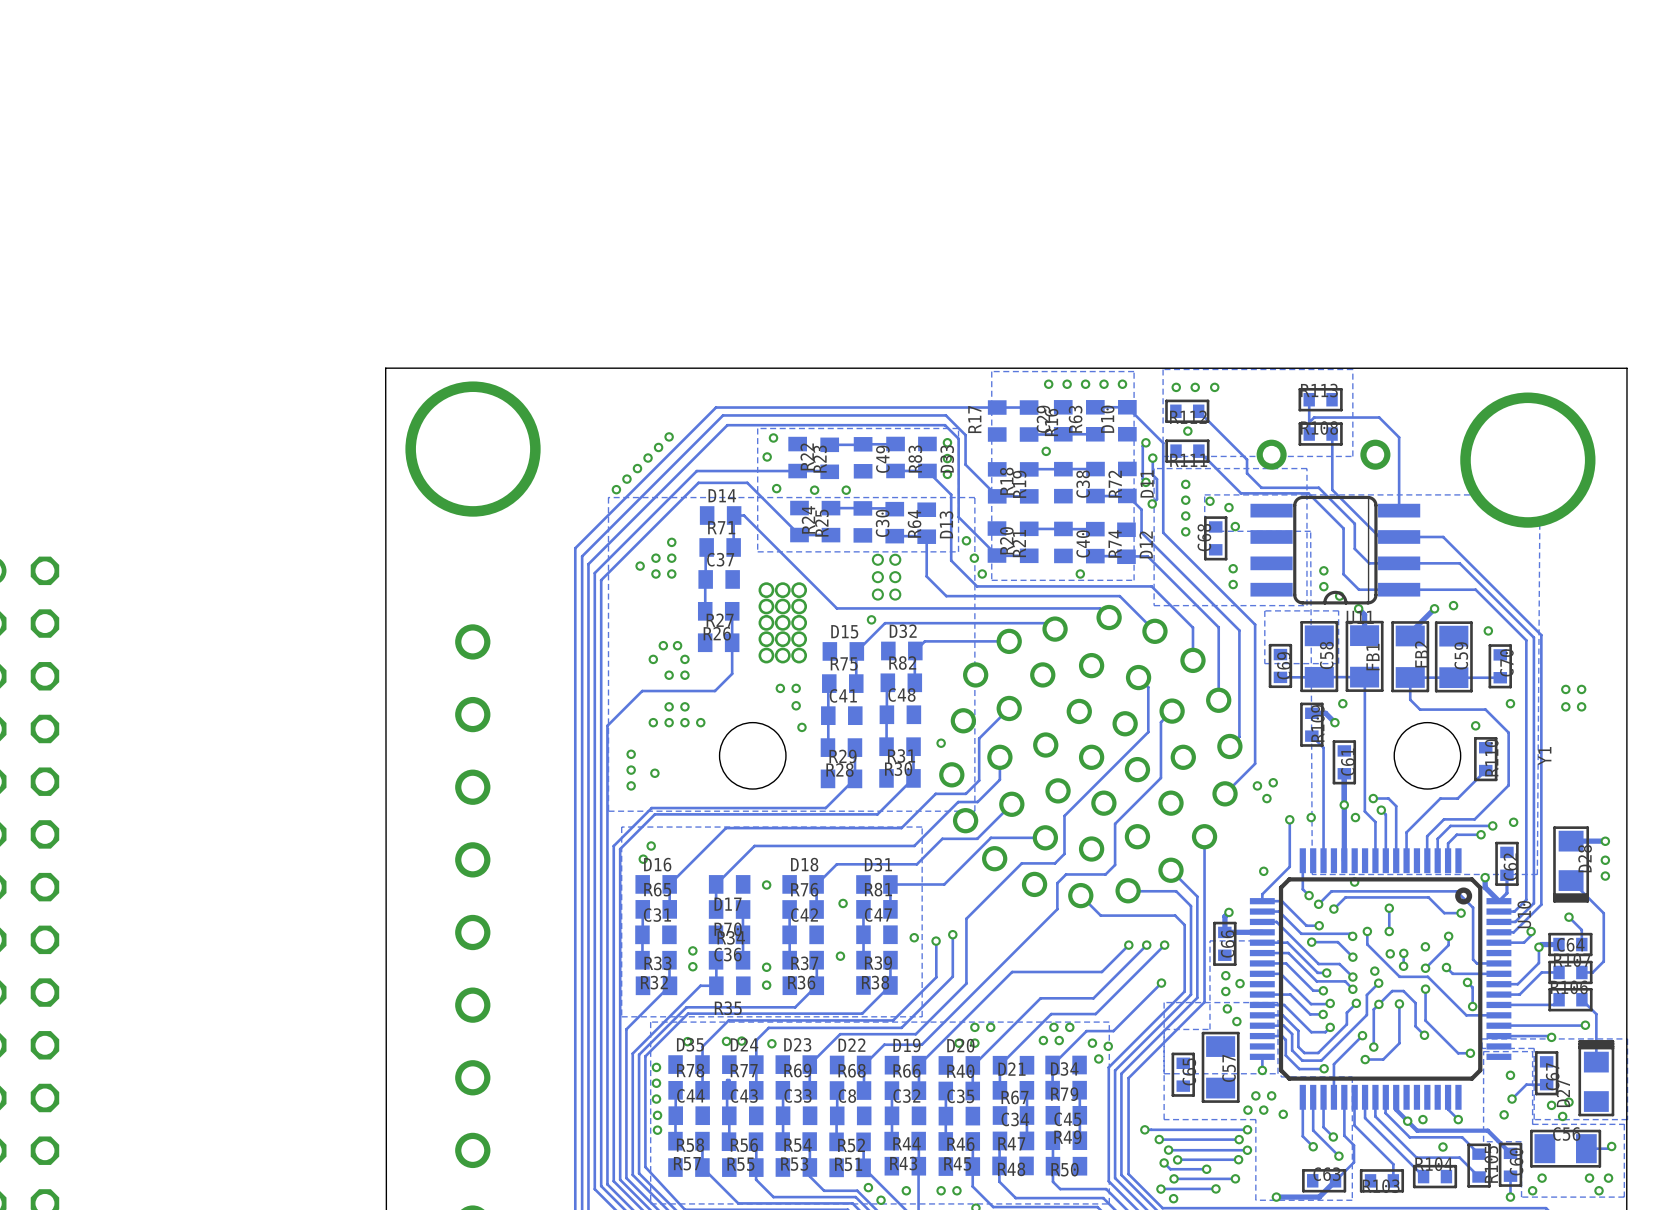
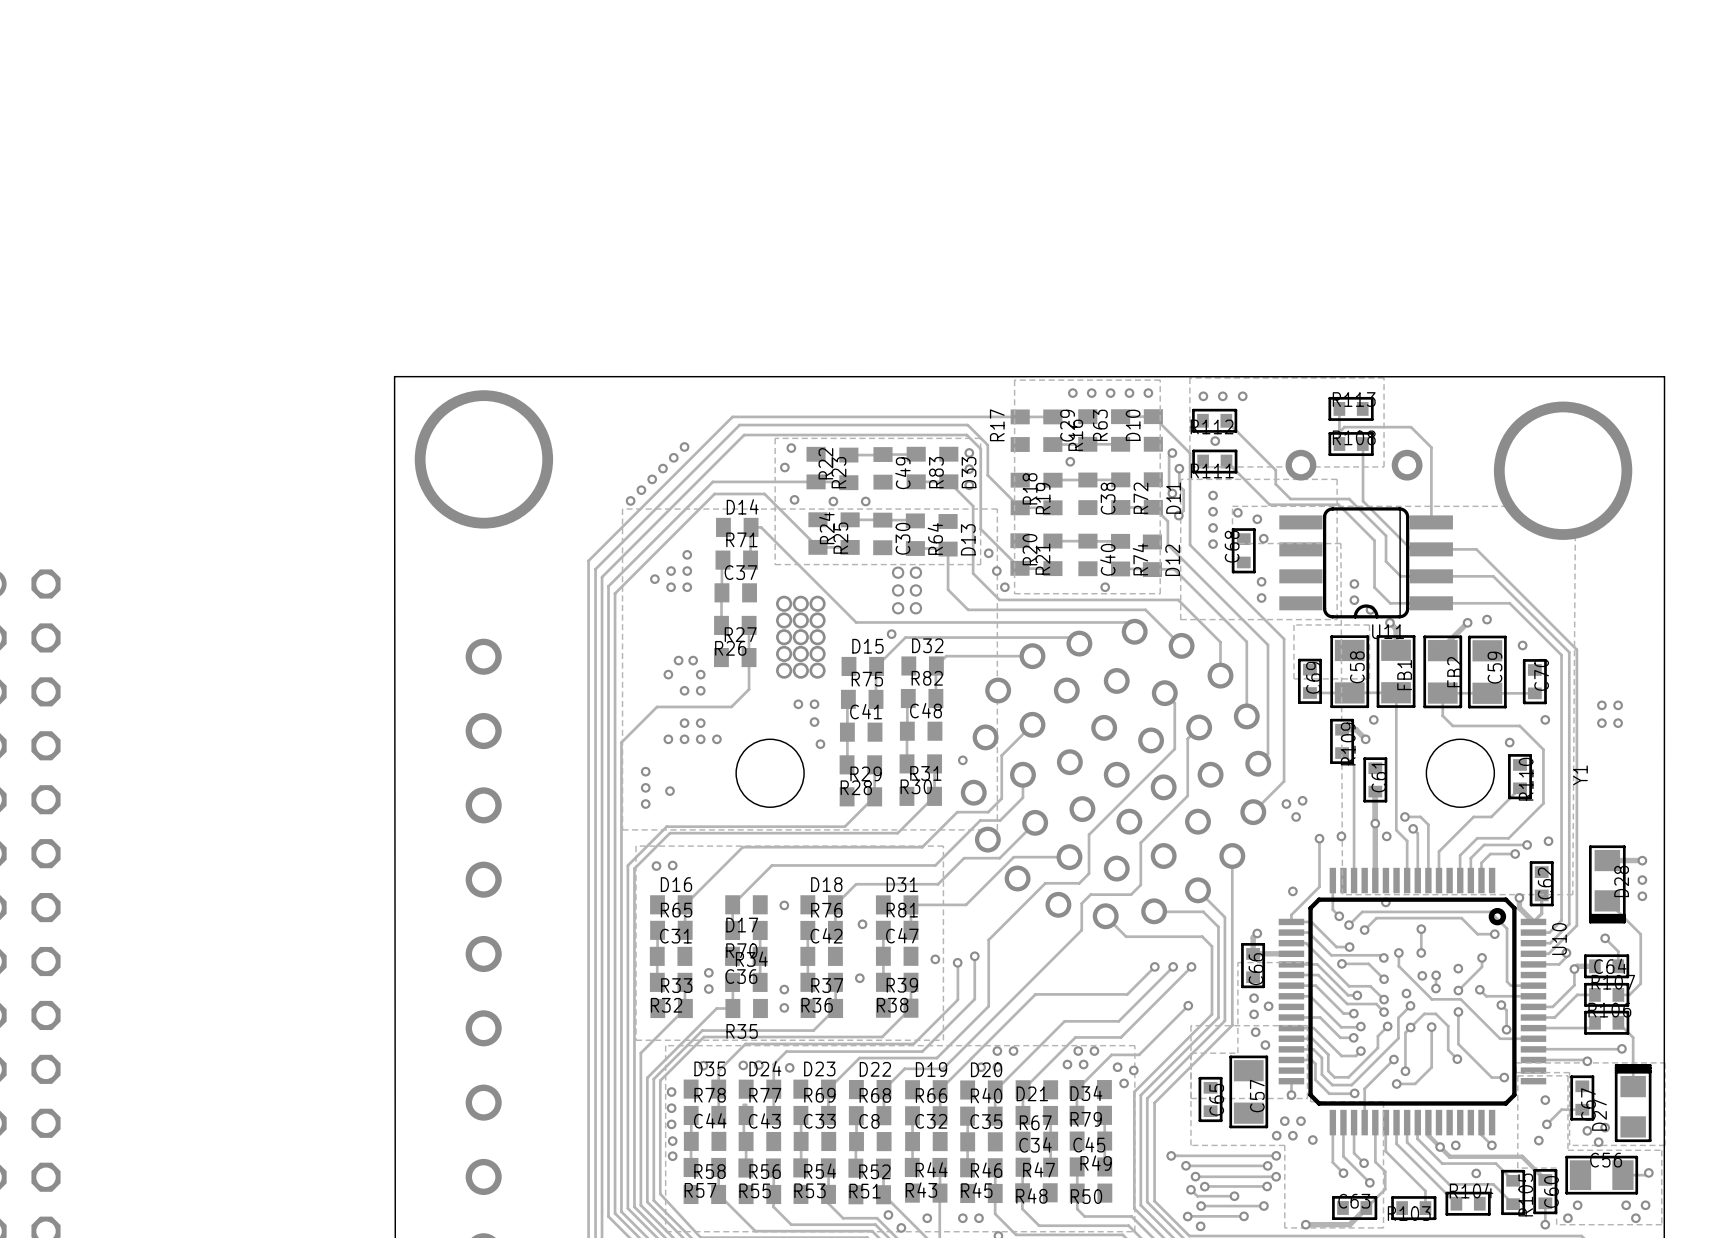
via: none -> (656, 866)
via: (651, 846) -> none
via: none -> (672, 865)
via: (643, 859) -> none

